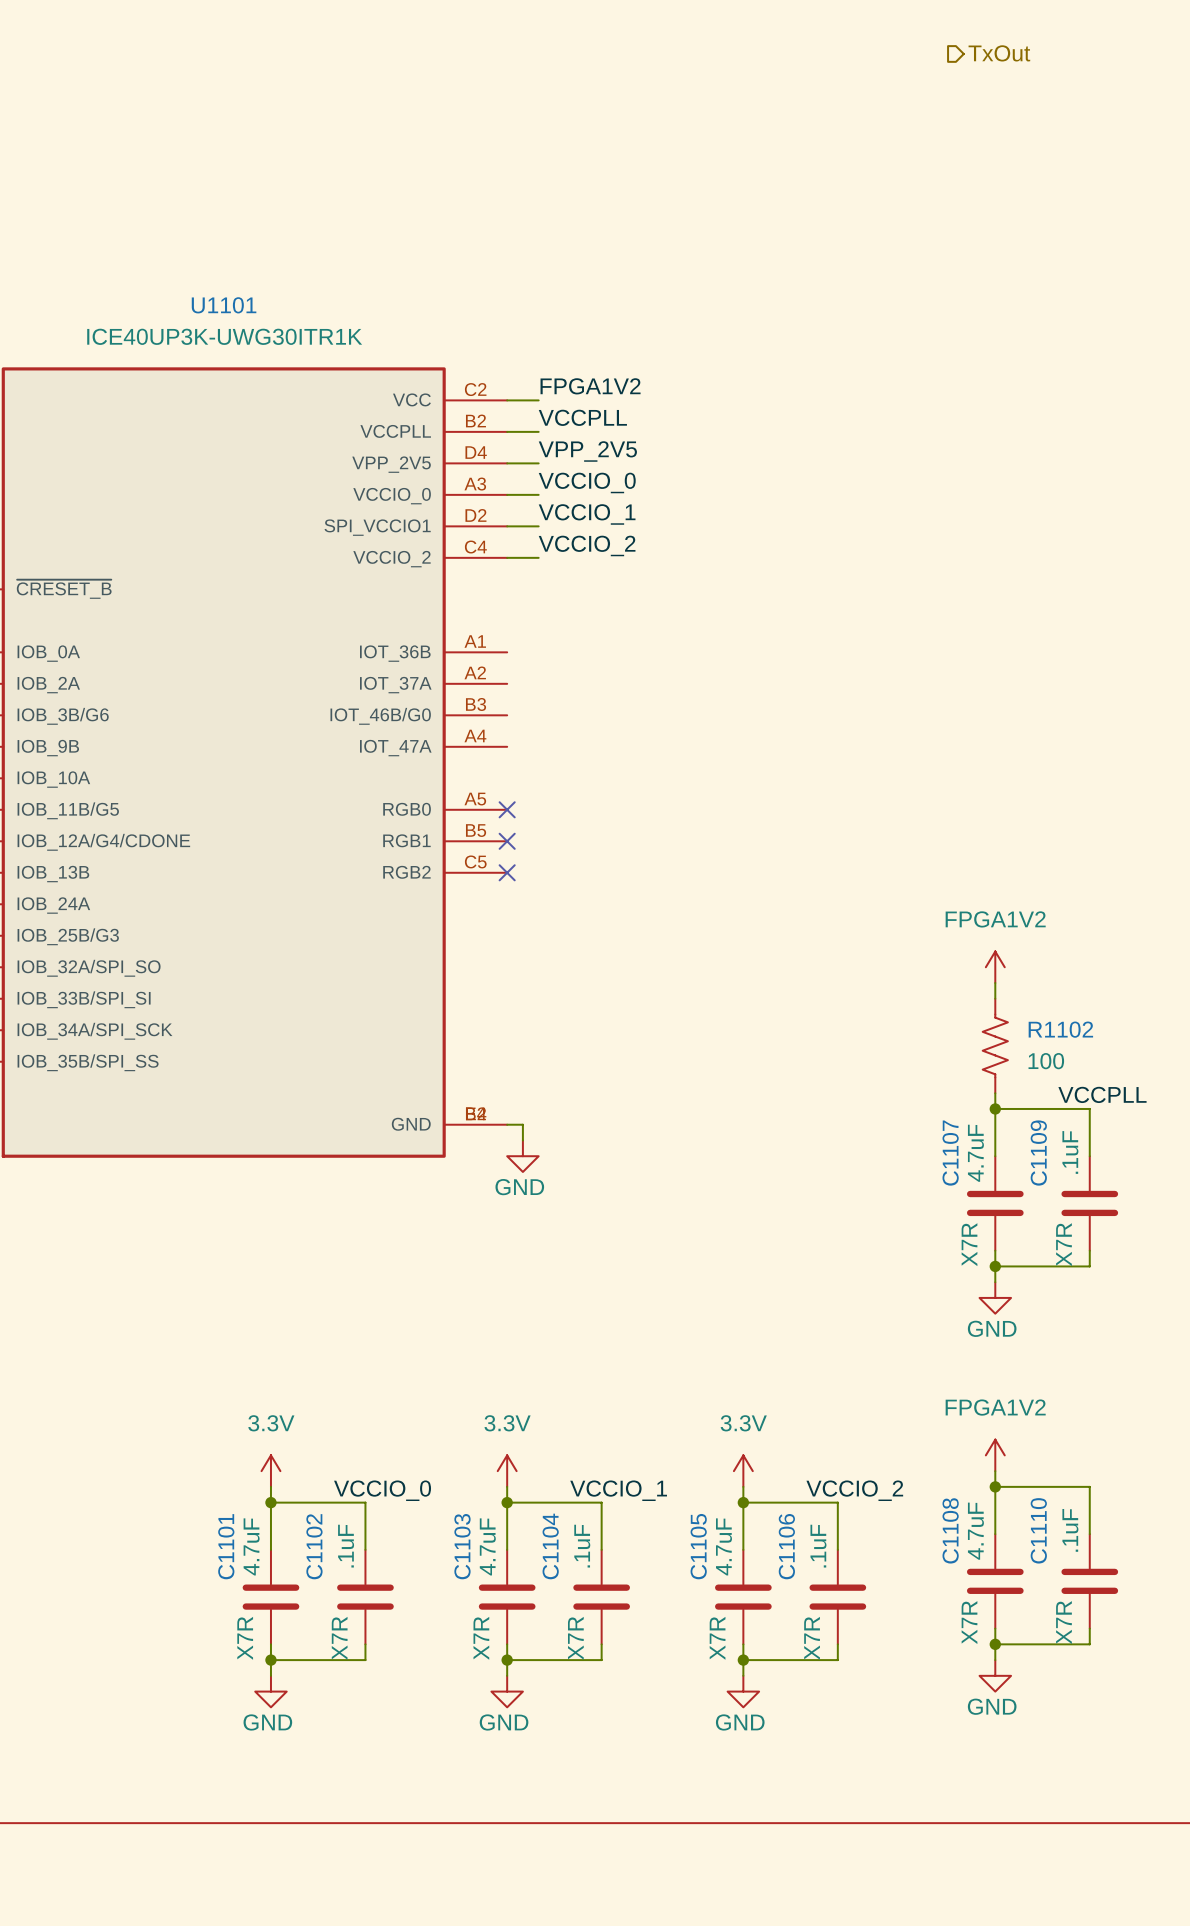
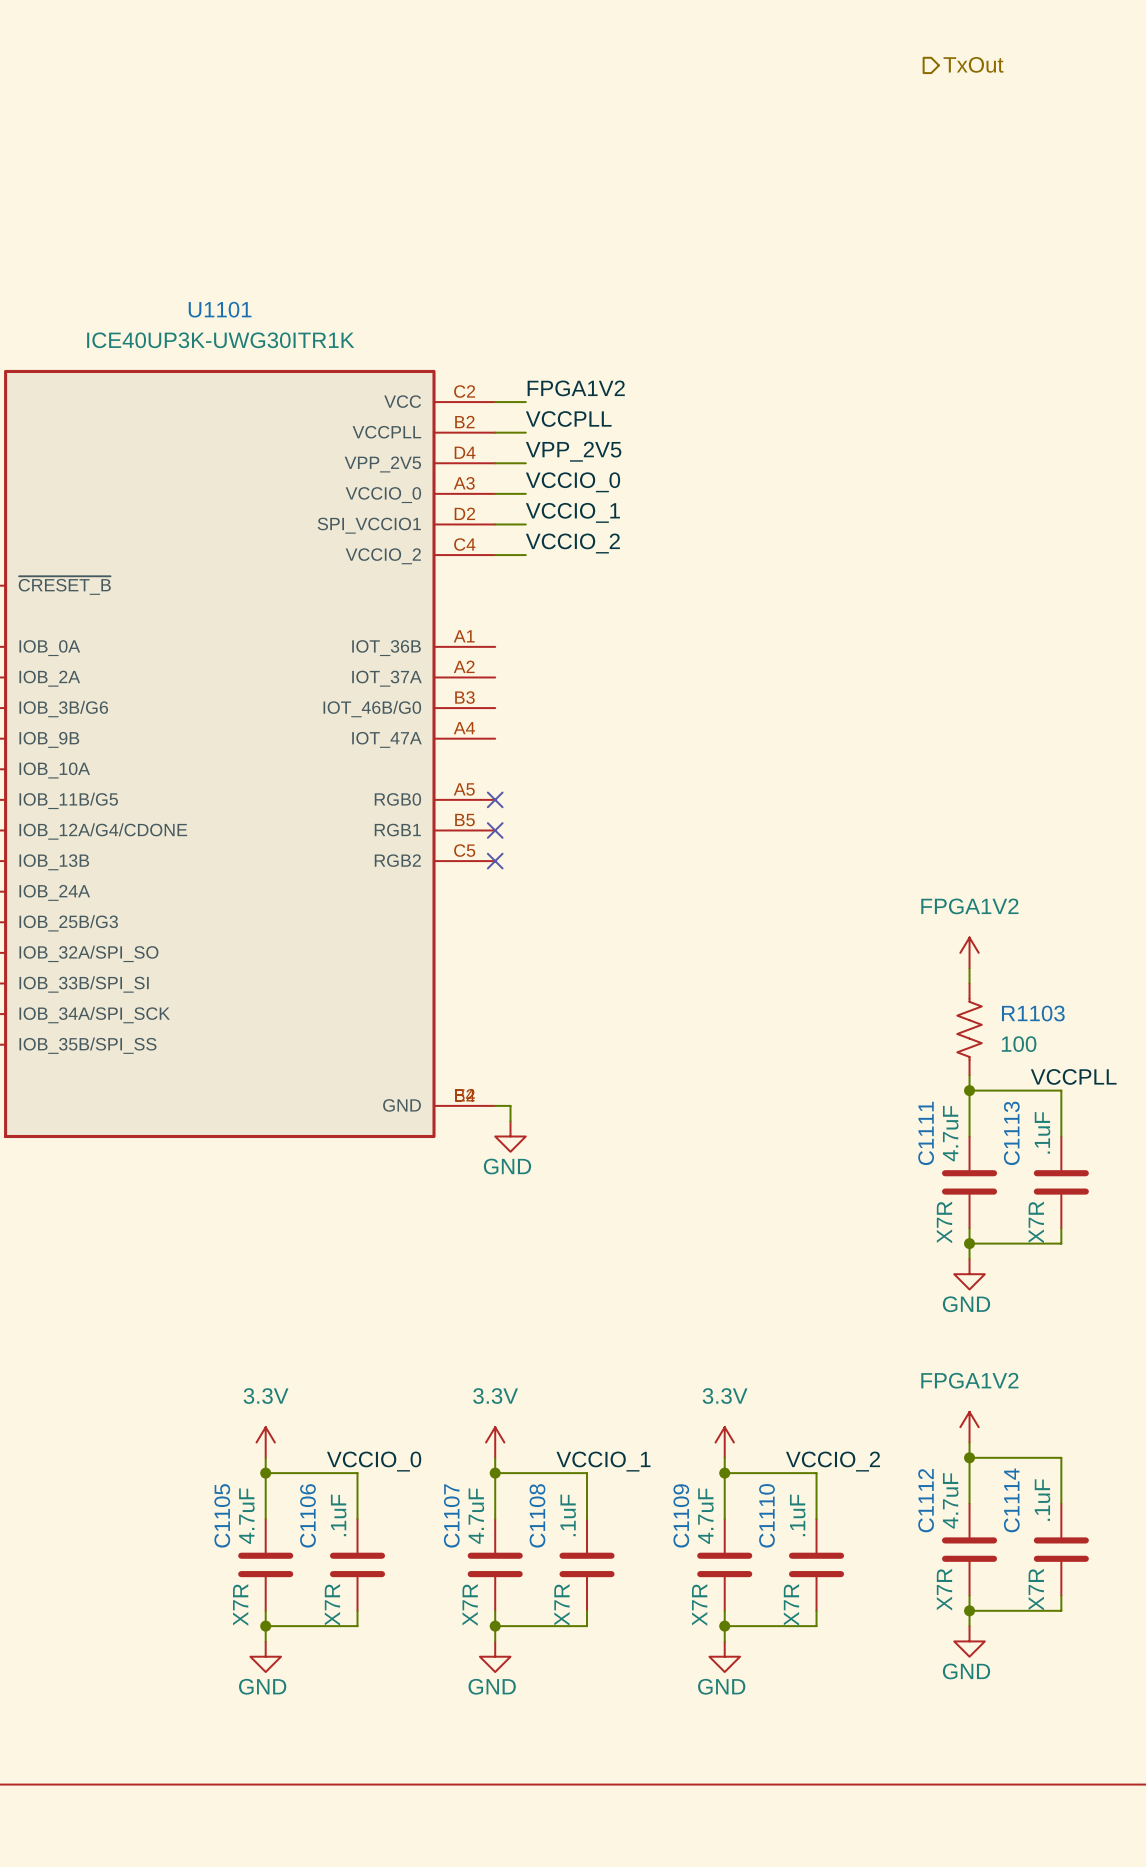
R1102 name: R1102 (1060, 1029) -> R1103 (1033, 1013)
C1107 name: C1107 (950, 1153) -> C1111 (926, 1133)
C1109 name: C1109 (1038, 1153) -> C1113 (1011, 1133)
C1108 name: C1108 (950, 1530) -> C1112 (926, 1500)
C1110 name: C1110 (1038, 1530) -> C1114 (1011, 1500)
C1101 name: C1101 (226, 1546) -> C1105 (222, 1515)
C1102 name: C1102 (314, 1546) -> C1106 (307, 1515)
C1103 name: C1103 (462, 1546) -> C1107 (451, 1515)
C1104 name: C1104 (550, 1546) -> C1108 (537, 1515)
C1105 name: C1105 (698, 1546) -> C1109 (681, 1515)
C1106 name: C1106 (786, 1546) -> C1110 (766, 1515)

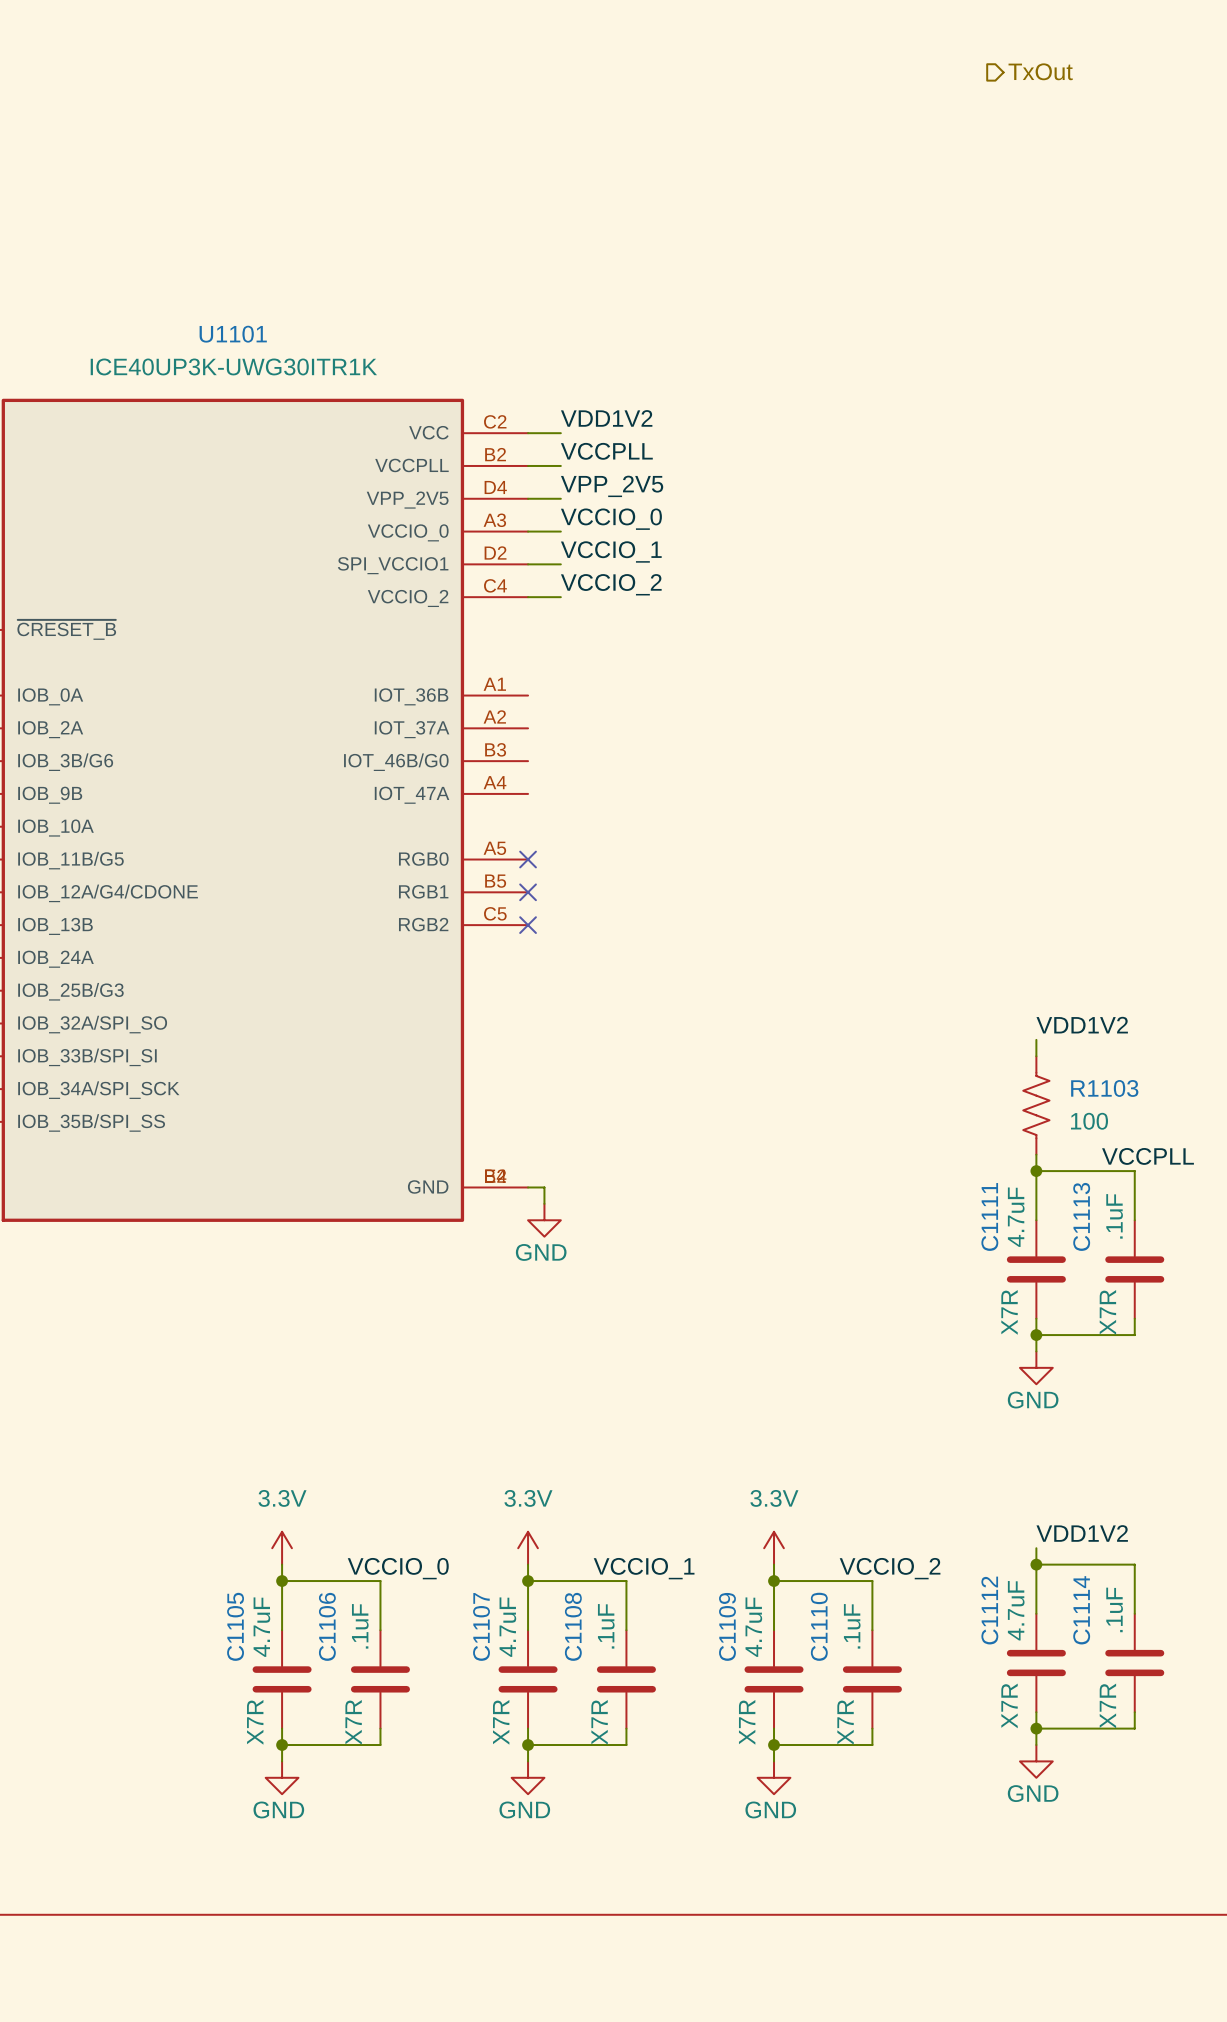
label: FPGA1V2 (576, 388) -> VDD1V2 (606, 418)
power symbol: FPGA1V2 (969, 952) -> none
label: none -> VDD1V2 (1082, 1025)
power symbol: FPGA1V2 (969, 1427) -> none
label: none -> VDD1V2 (1082, 1533)

